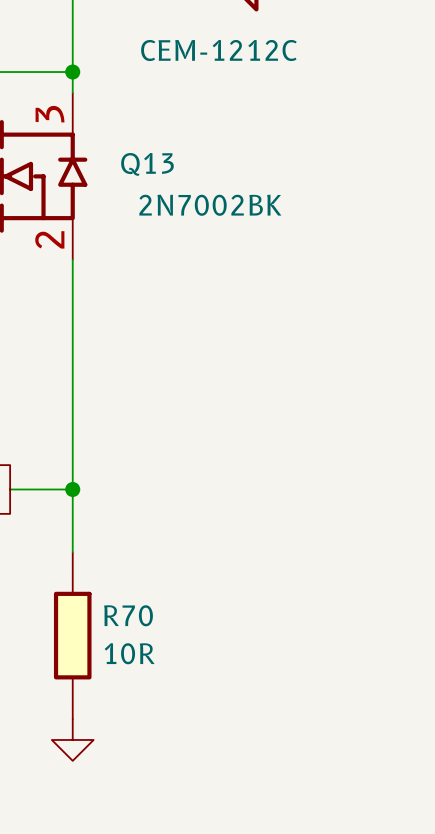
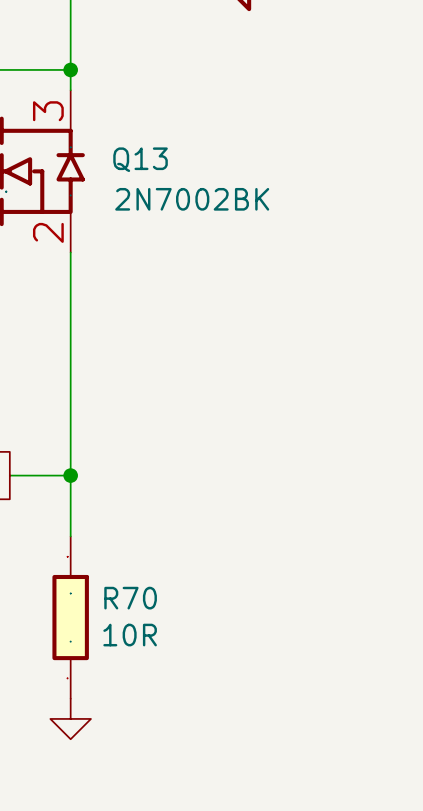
part text: CEM-1212C (218, 50) -> none

